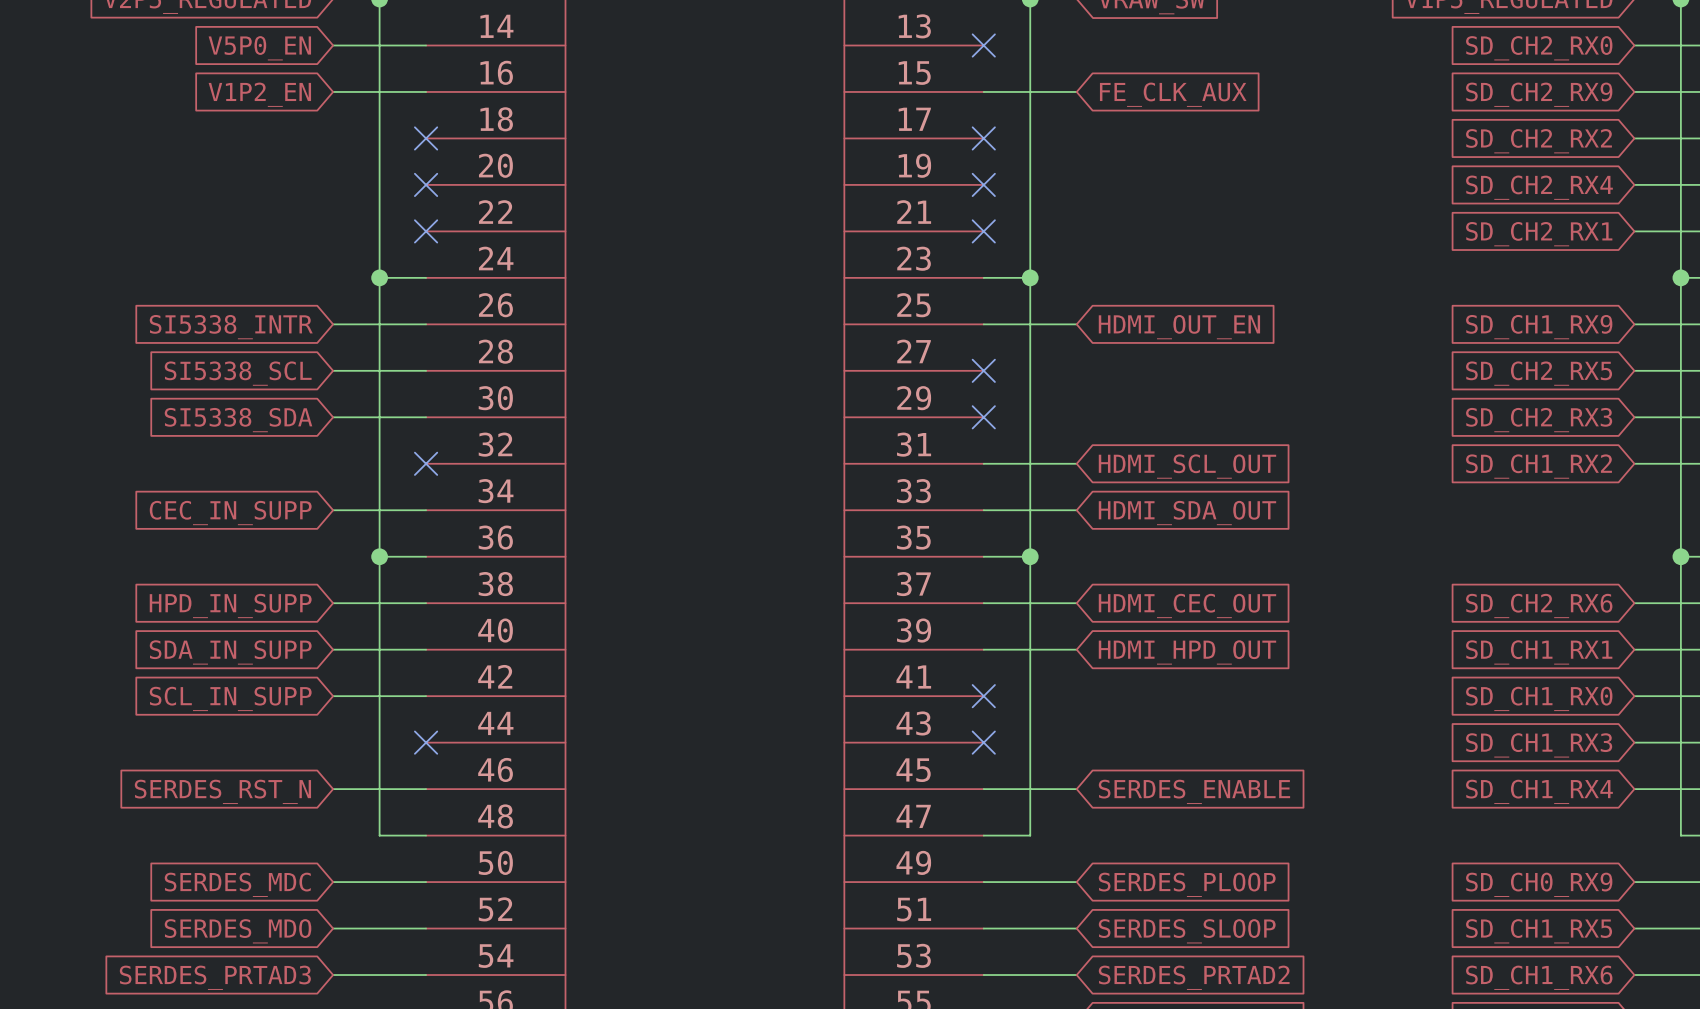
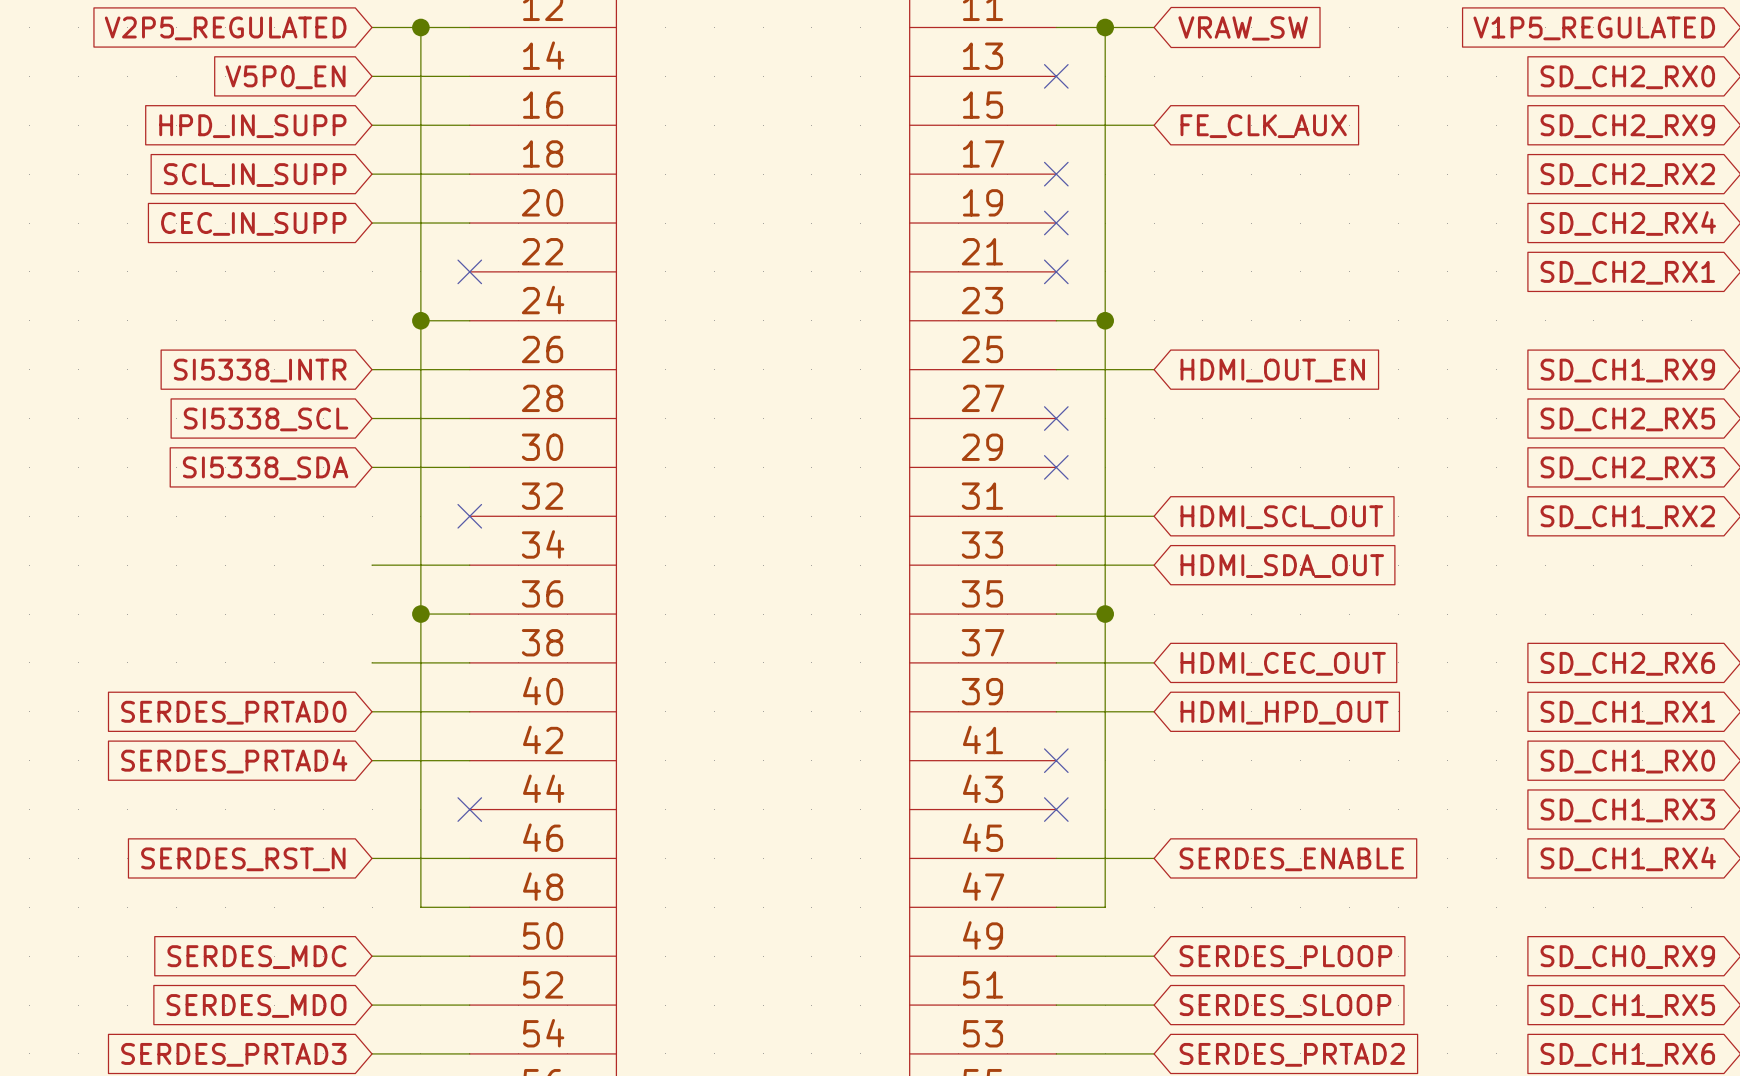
global label: V1P2_EN (259, 94) -> HPD_IN_SUPP (252, 126)
wire: none -> (372, 174) (469, 174)
no-connect mark: (426, 138) -> none
global label: none -> SCL_IN_SUPP (255, 175)
wire: none -> (372, 223) (469, 223)
no-connect mark: (426, 184) -> none
global label position: CEC_IN_SUPP (230, 513) -> CEC_IN_SUPP (253, 223)
global label: HPD_IN_SUPP (230, 605) -> none
global label: SDA_IN_SUPP (230, 652) -> SERDES_PRTAD0 (233, 712)
global label: SCL_IN_SUPP (230, 698) -> SERDES_PRTAD4 (234, 761)

